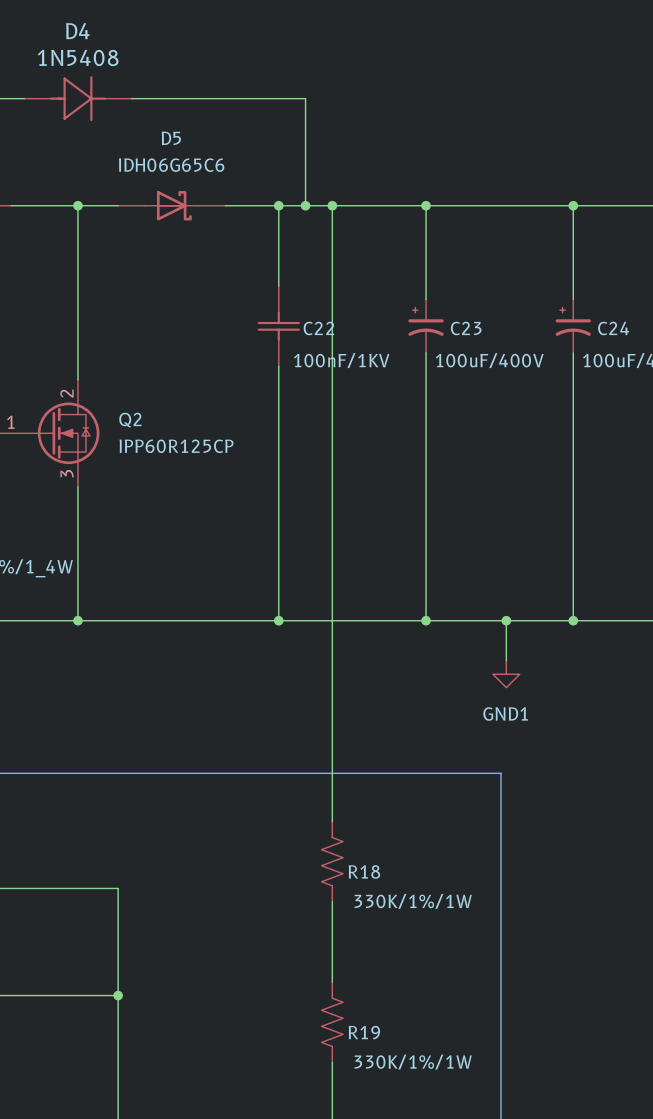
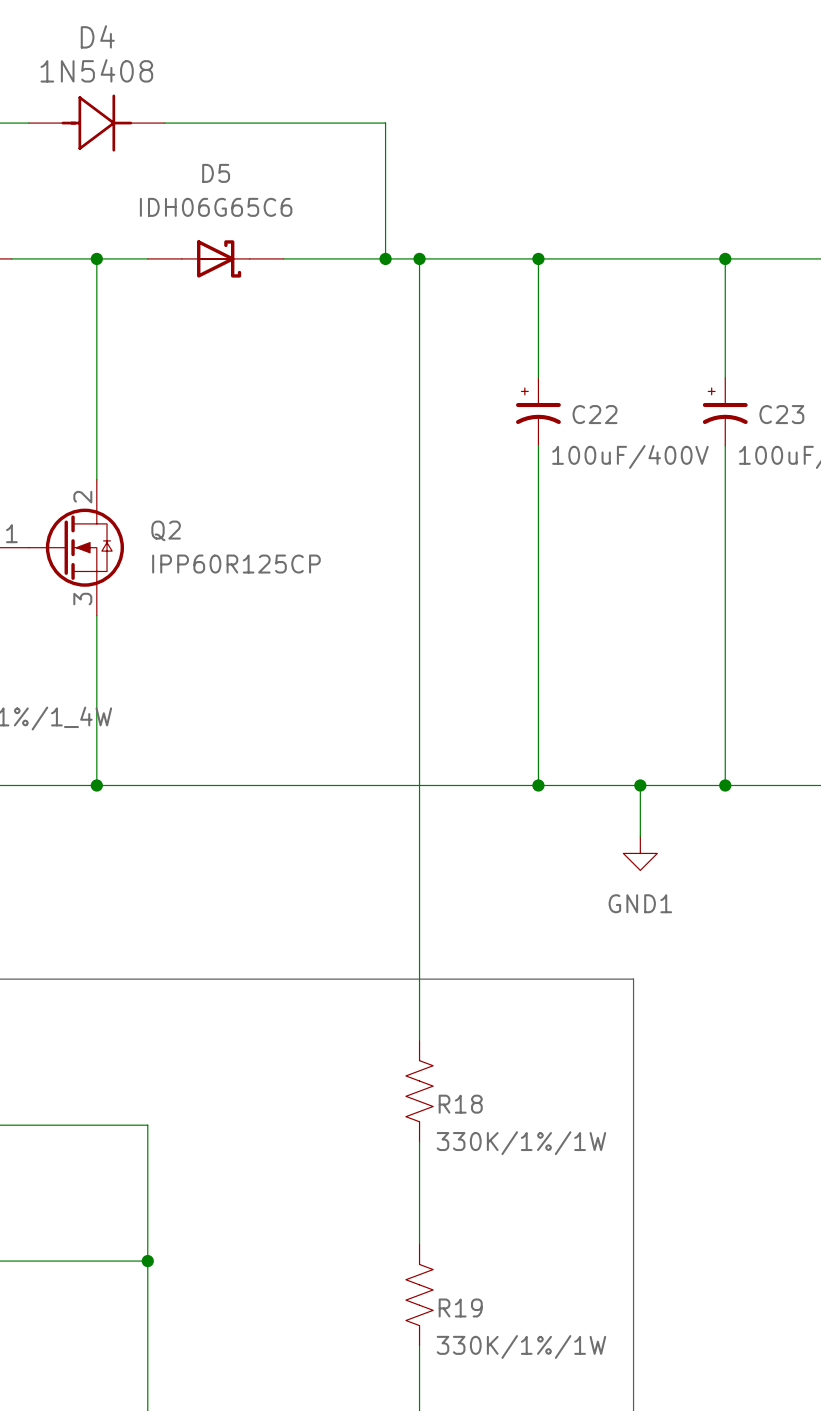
wire: (278, 205) (278, 286) -> none
junction: (278, 205) -> none
C22: 100nF/1KV (278, 326) -> none
C23 name: C23 (466, 328) -> C22 (595, 414)
C24 name: C24 (613, 328) -> C23 (781, 414)
wire: (278, 366) (278, 620) -> none
junction: (278, 620) -> none

